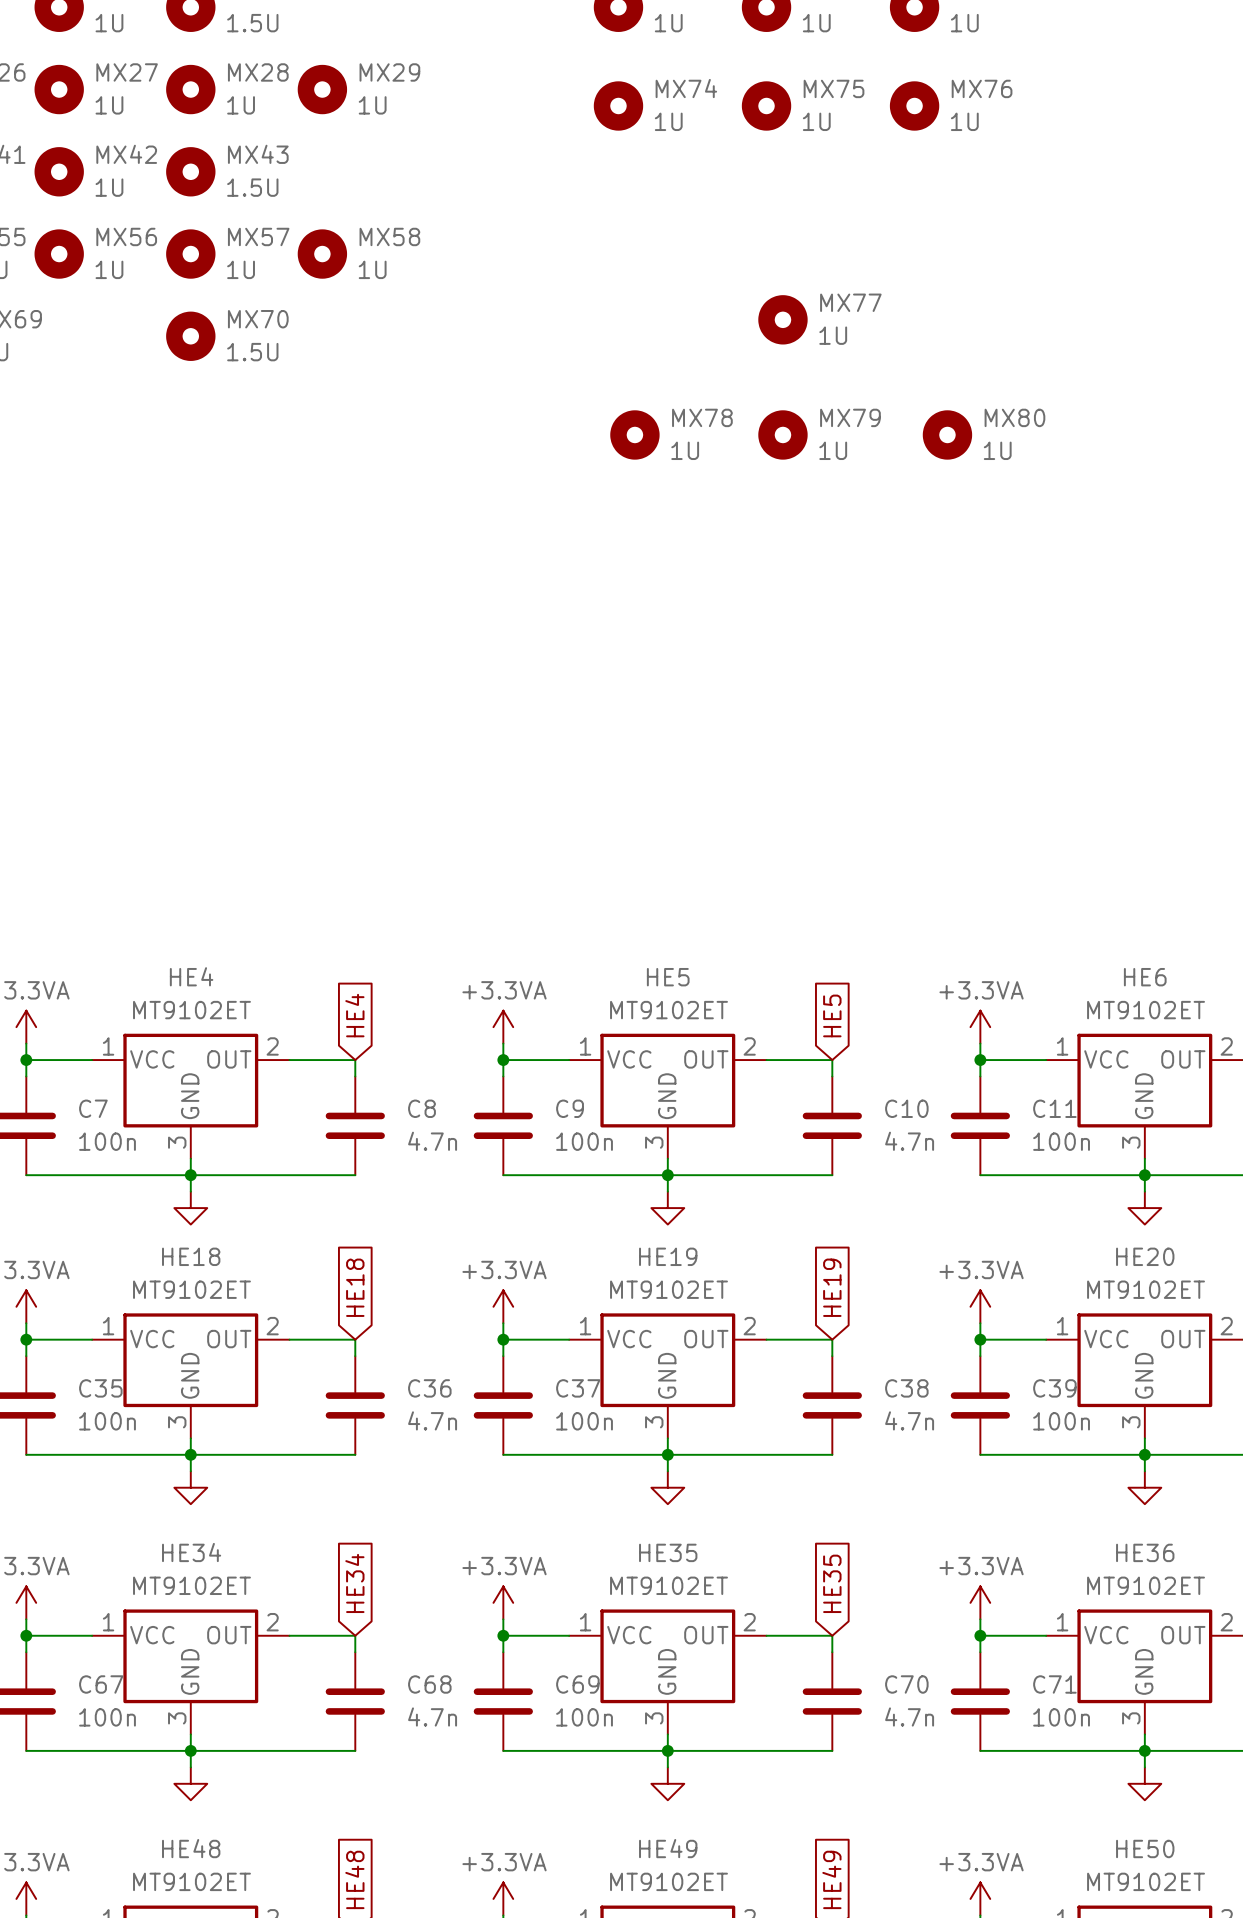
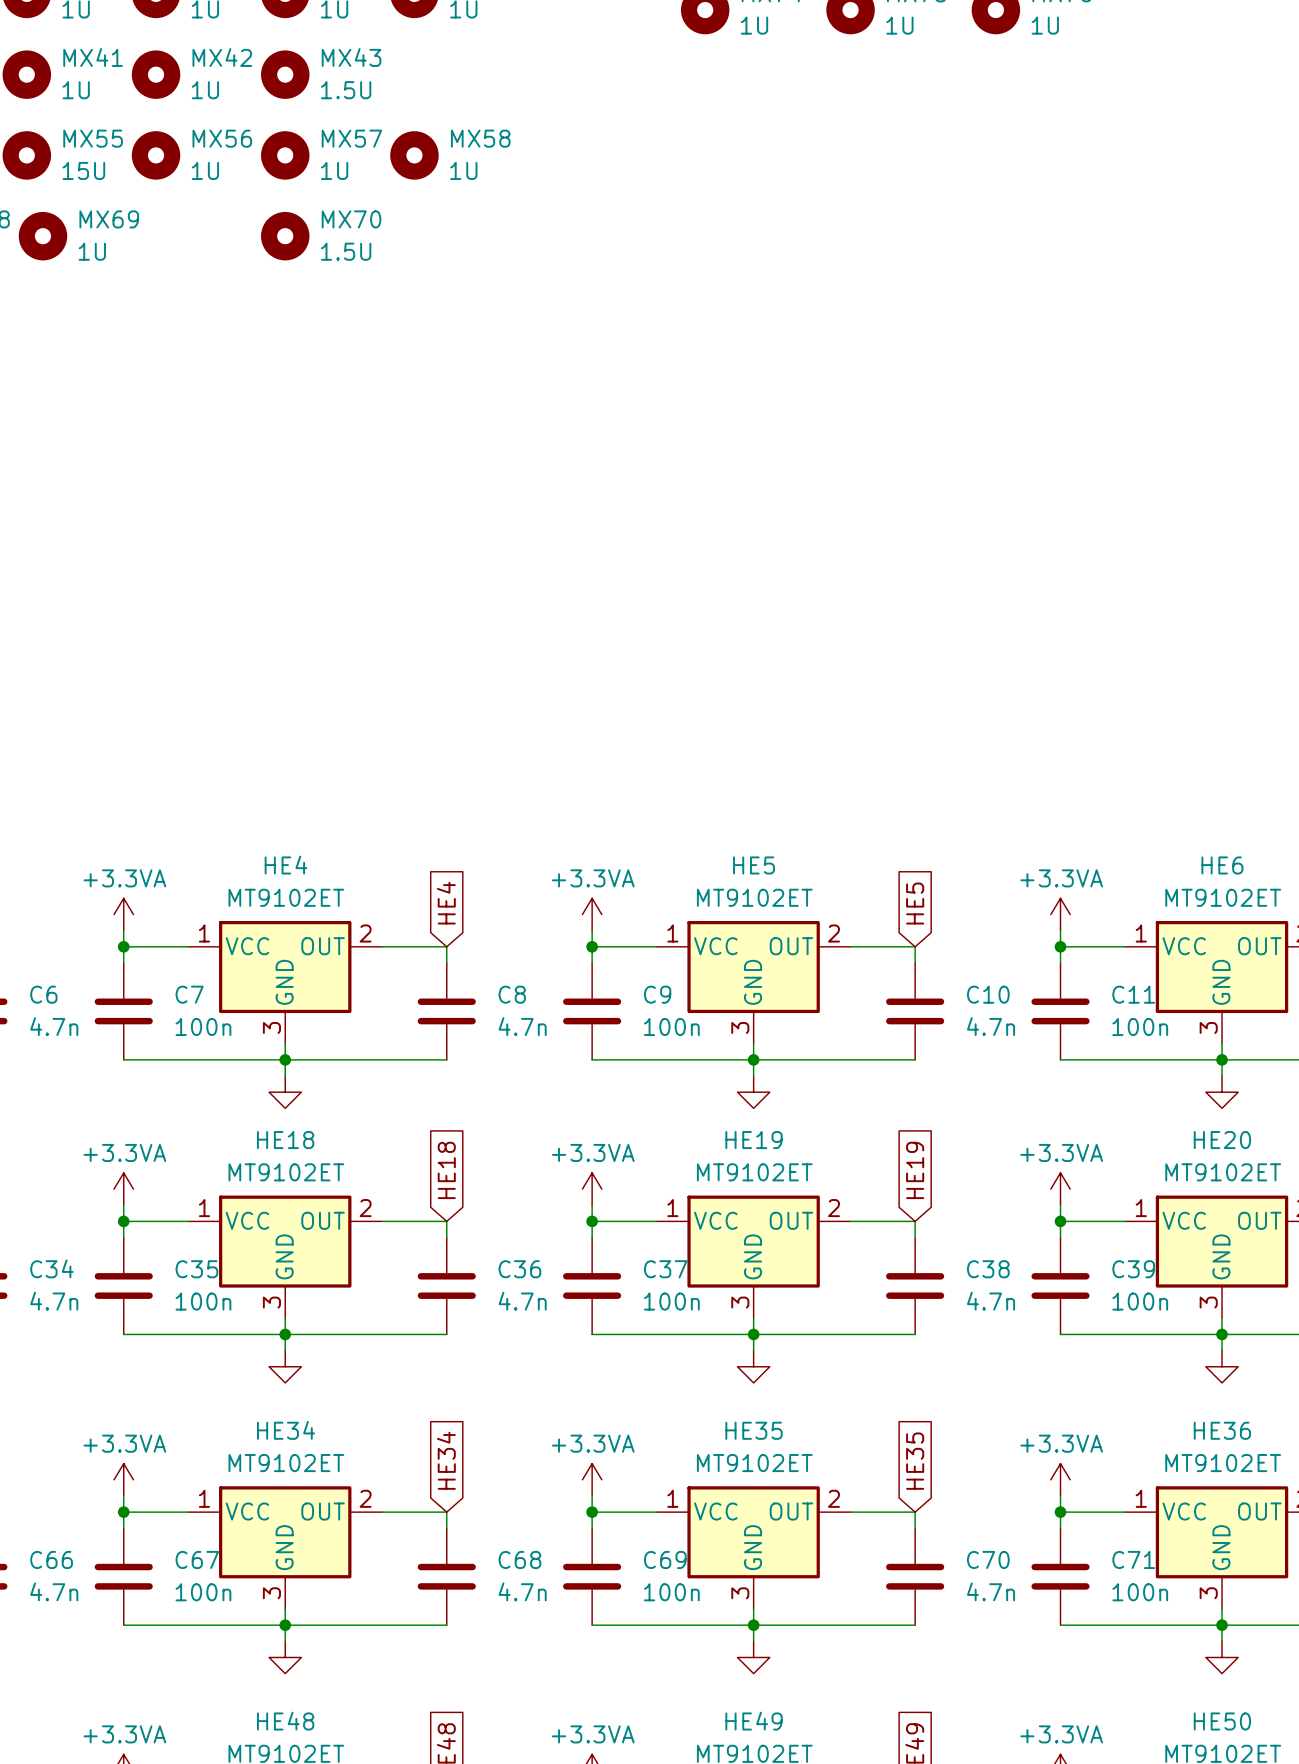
MX77: 1U (782, 319) -> none
MX78: 1U (634, 434) -> none
MX79: 1U (782, 434) -> none
MX80: 1U (947, 434) -> none

